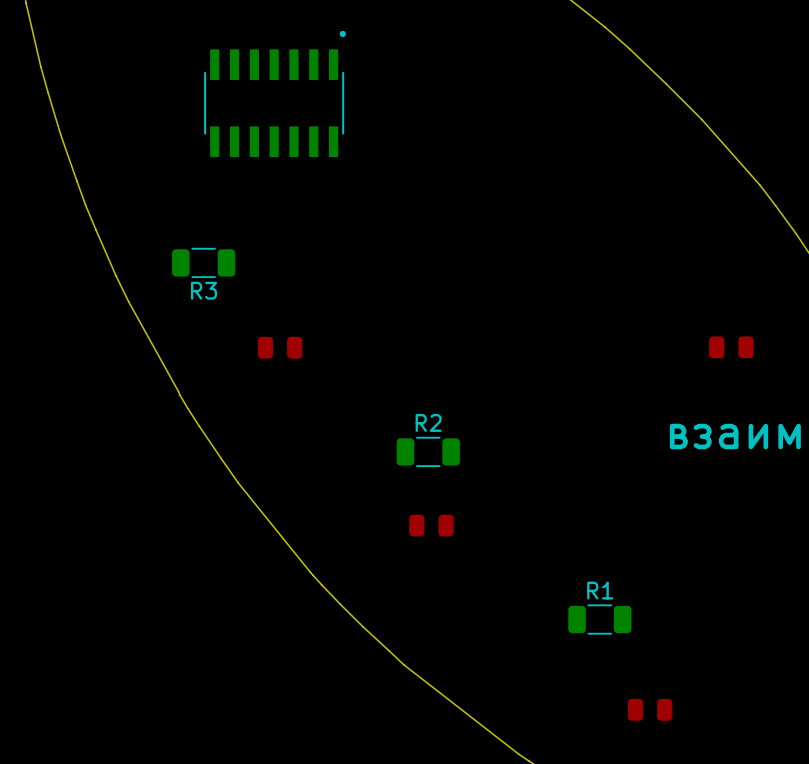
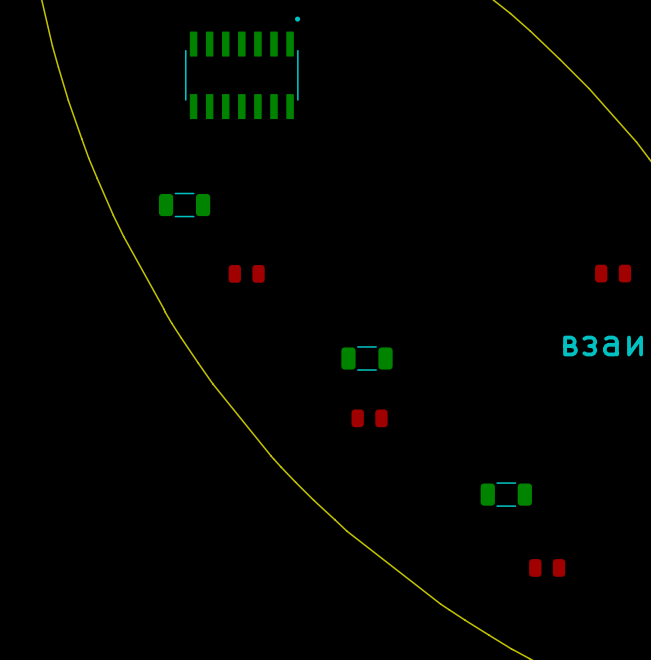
R3 name: R3 (204, 290) -> none
R2 name: R2 (428, 422) -> none
R1 name: R1 (600, 590) -> none

